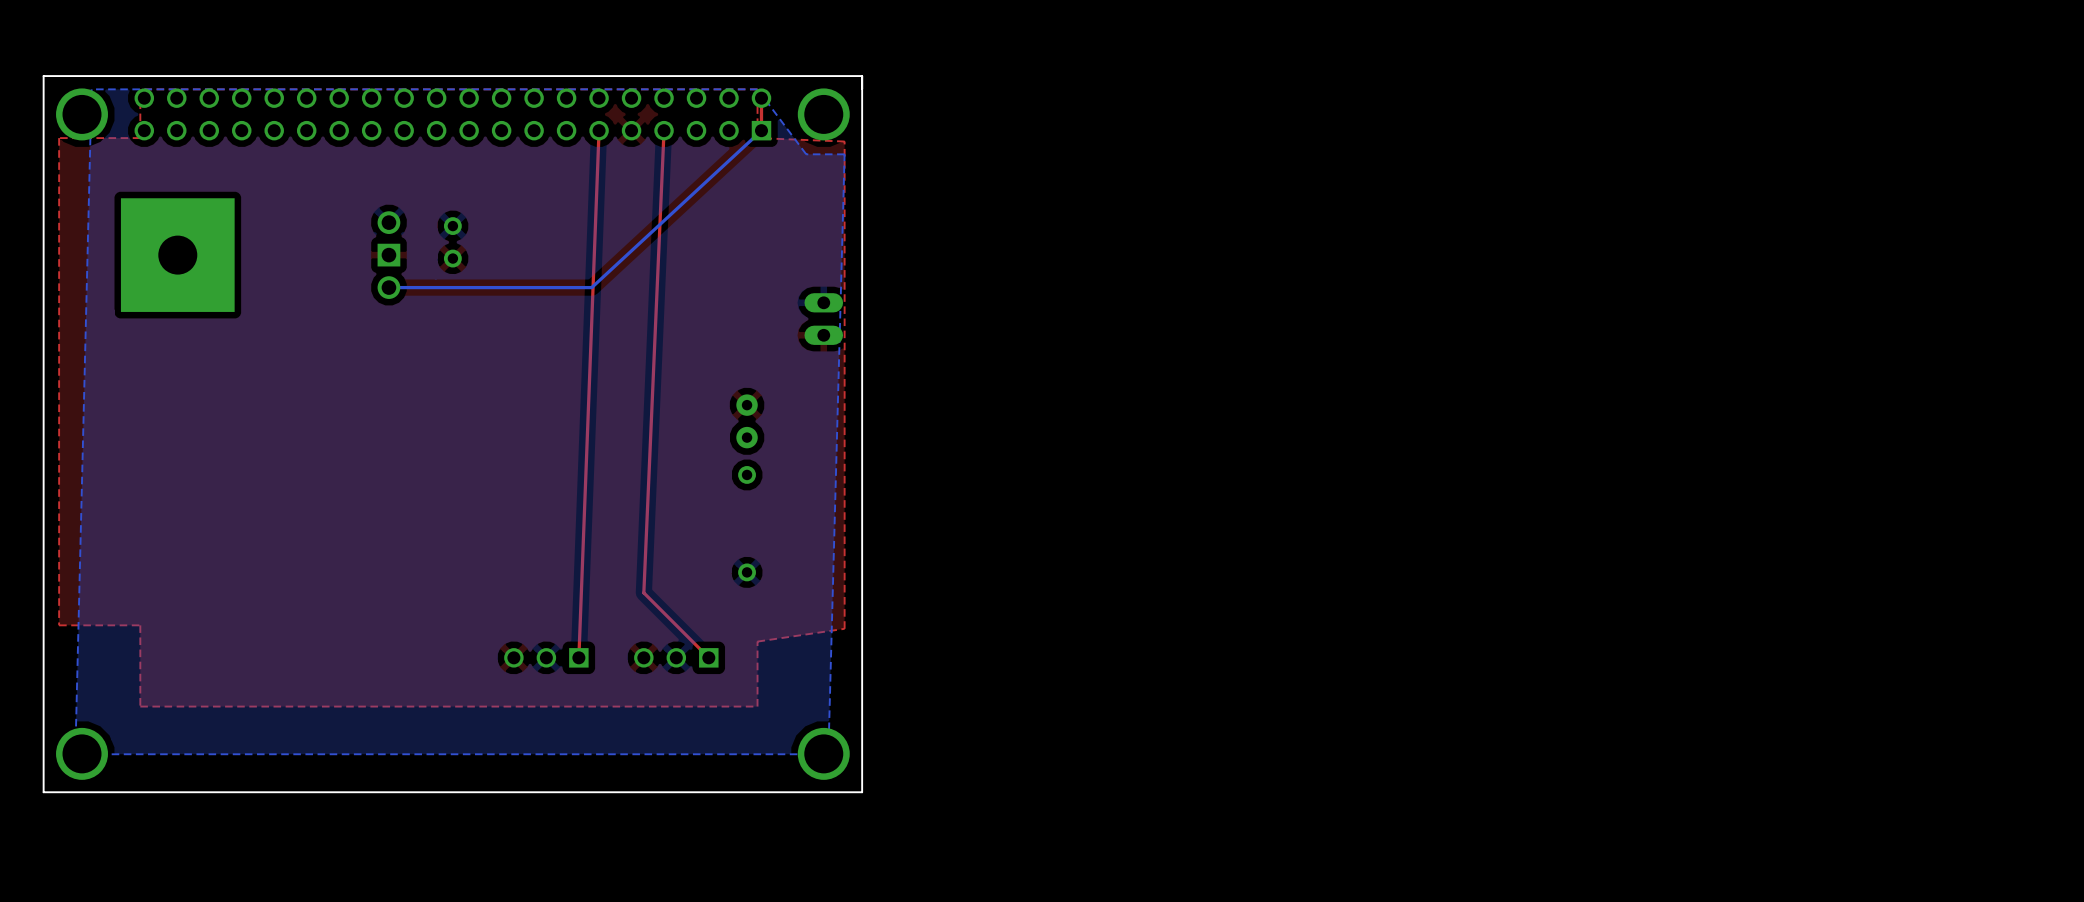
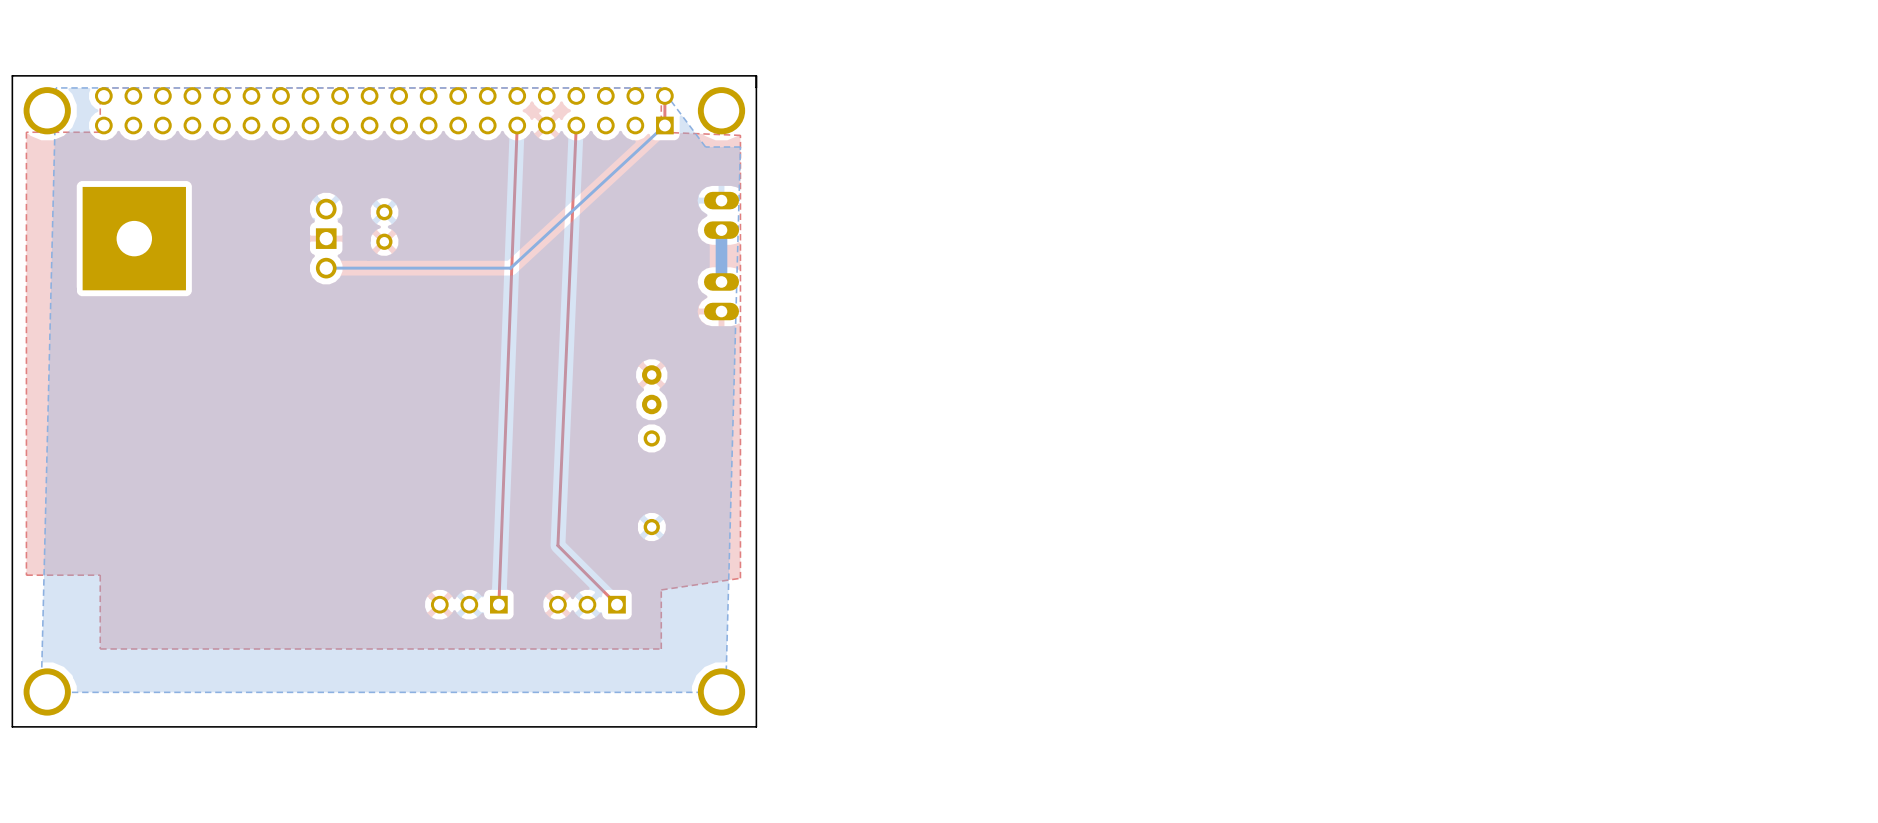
part: none -> (721, 215)
bottom track: none -> (721, 230) (721, 281)

